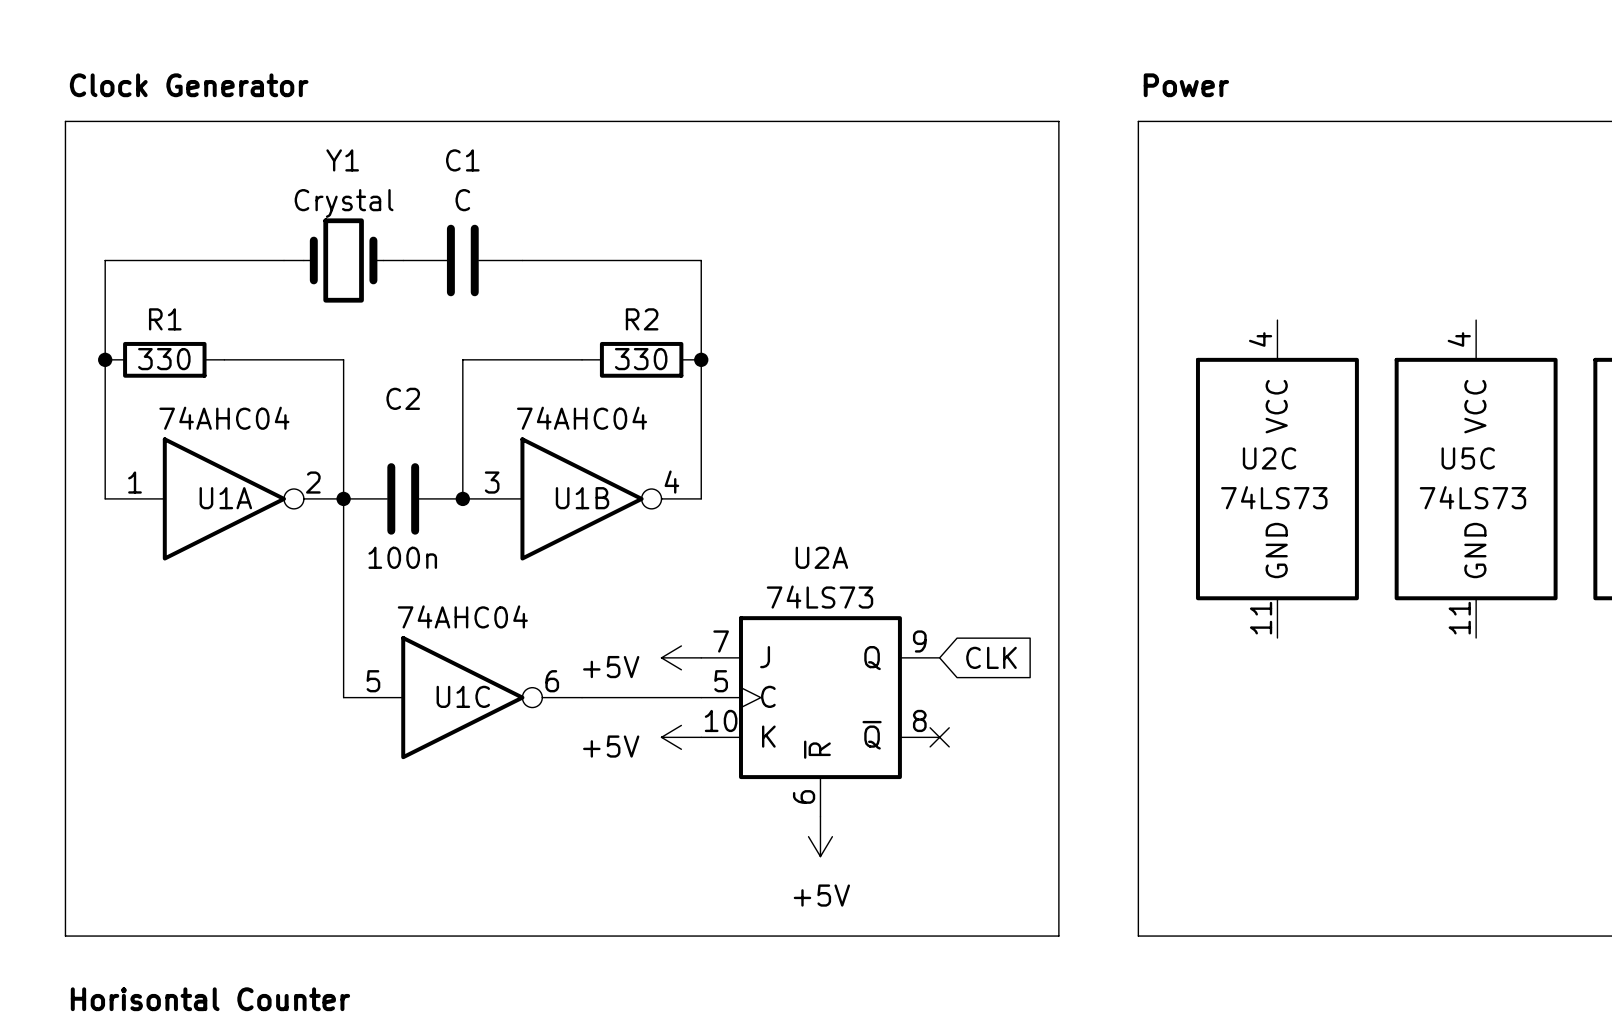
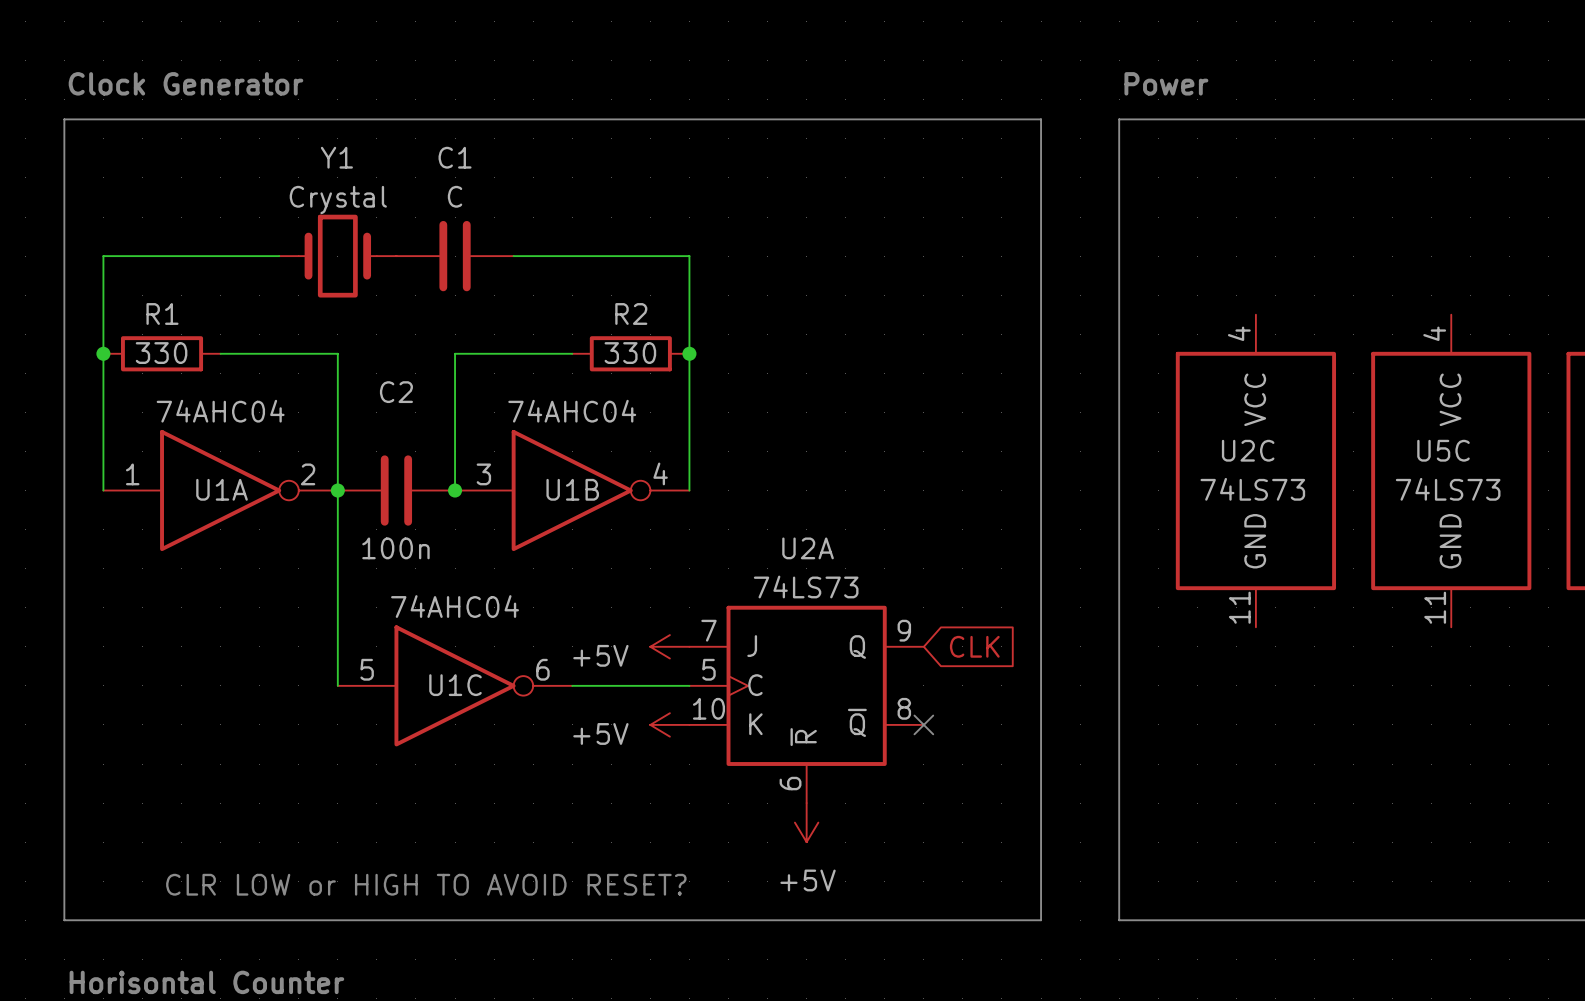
text: none -> CLR LOW or HIGH TO AVOID RESET? (426, 884)

